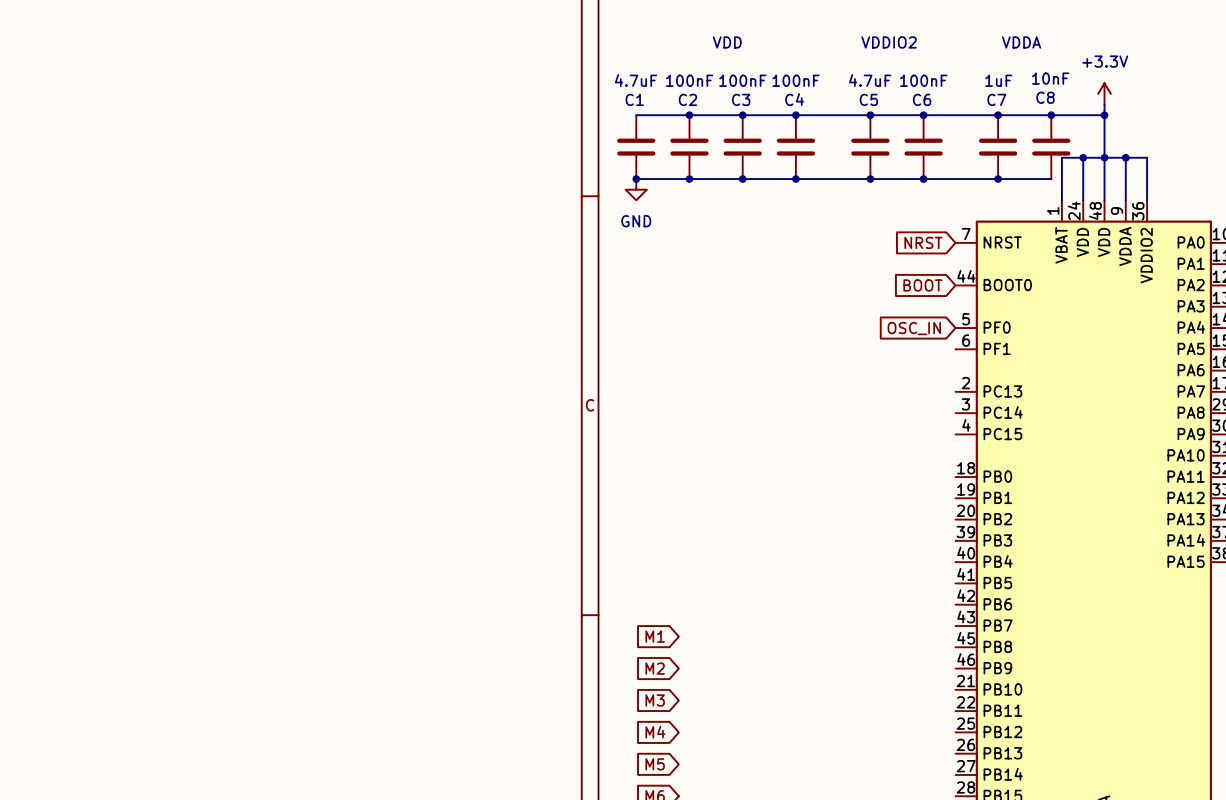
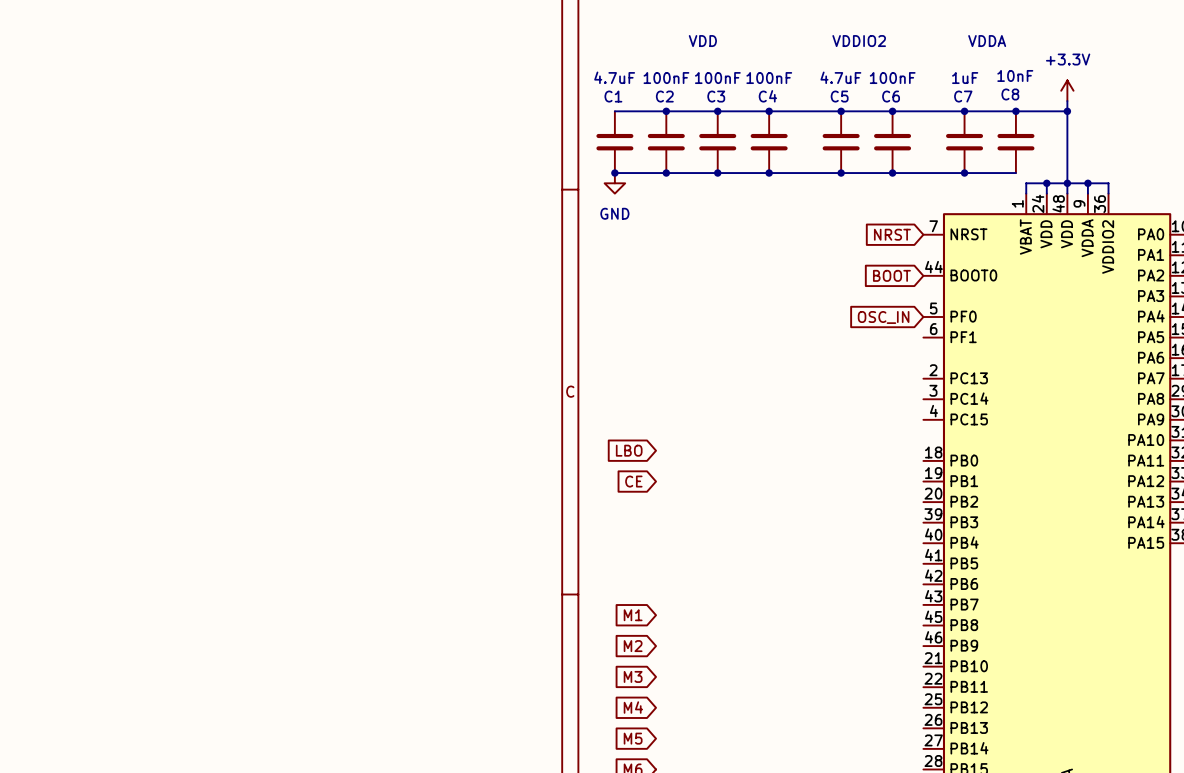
wire: (1083, 157) (1083, 189) -> none
junction: (1083, 157) -> none
junction: (1104, 157) -> none
wire: (1125, 157) (1125, 189) -> none
junction: (1125, 157) -> none
wire: (1061, 189) (1061, 157) (1147, 157) (1147, 189) -> (1026, 183) (1108, 183)
junction: none -> (1046, 183)
junction: none -> (1067, 183)
junction: none -> (1087, 183)
global label: none -> LBO (629, 450)
global label: none -> CE (633, 481)

